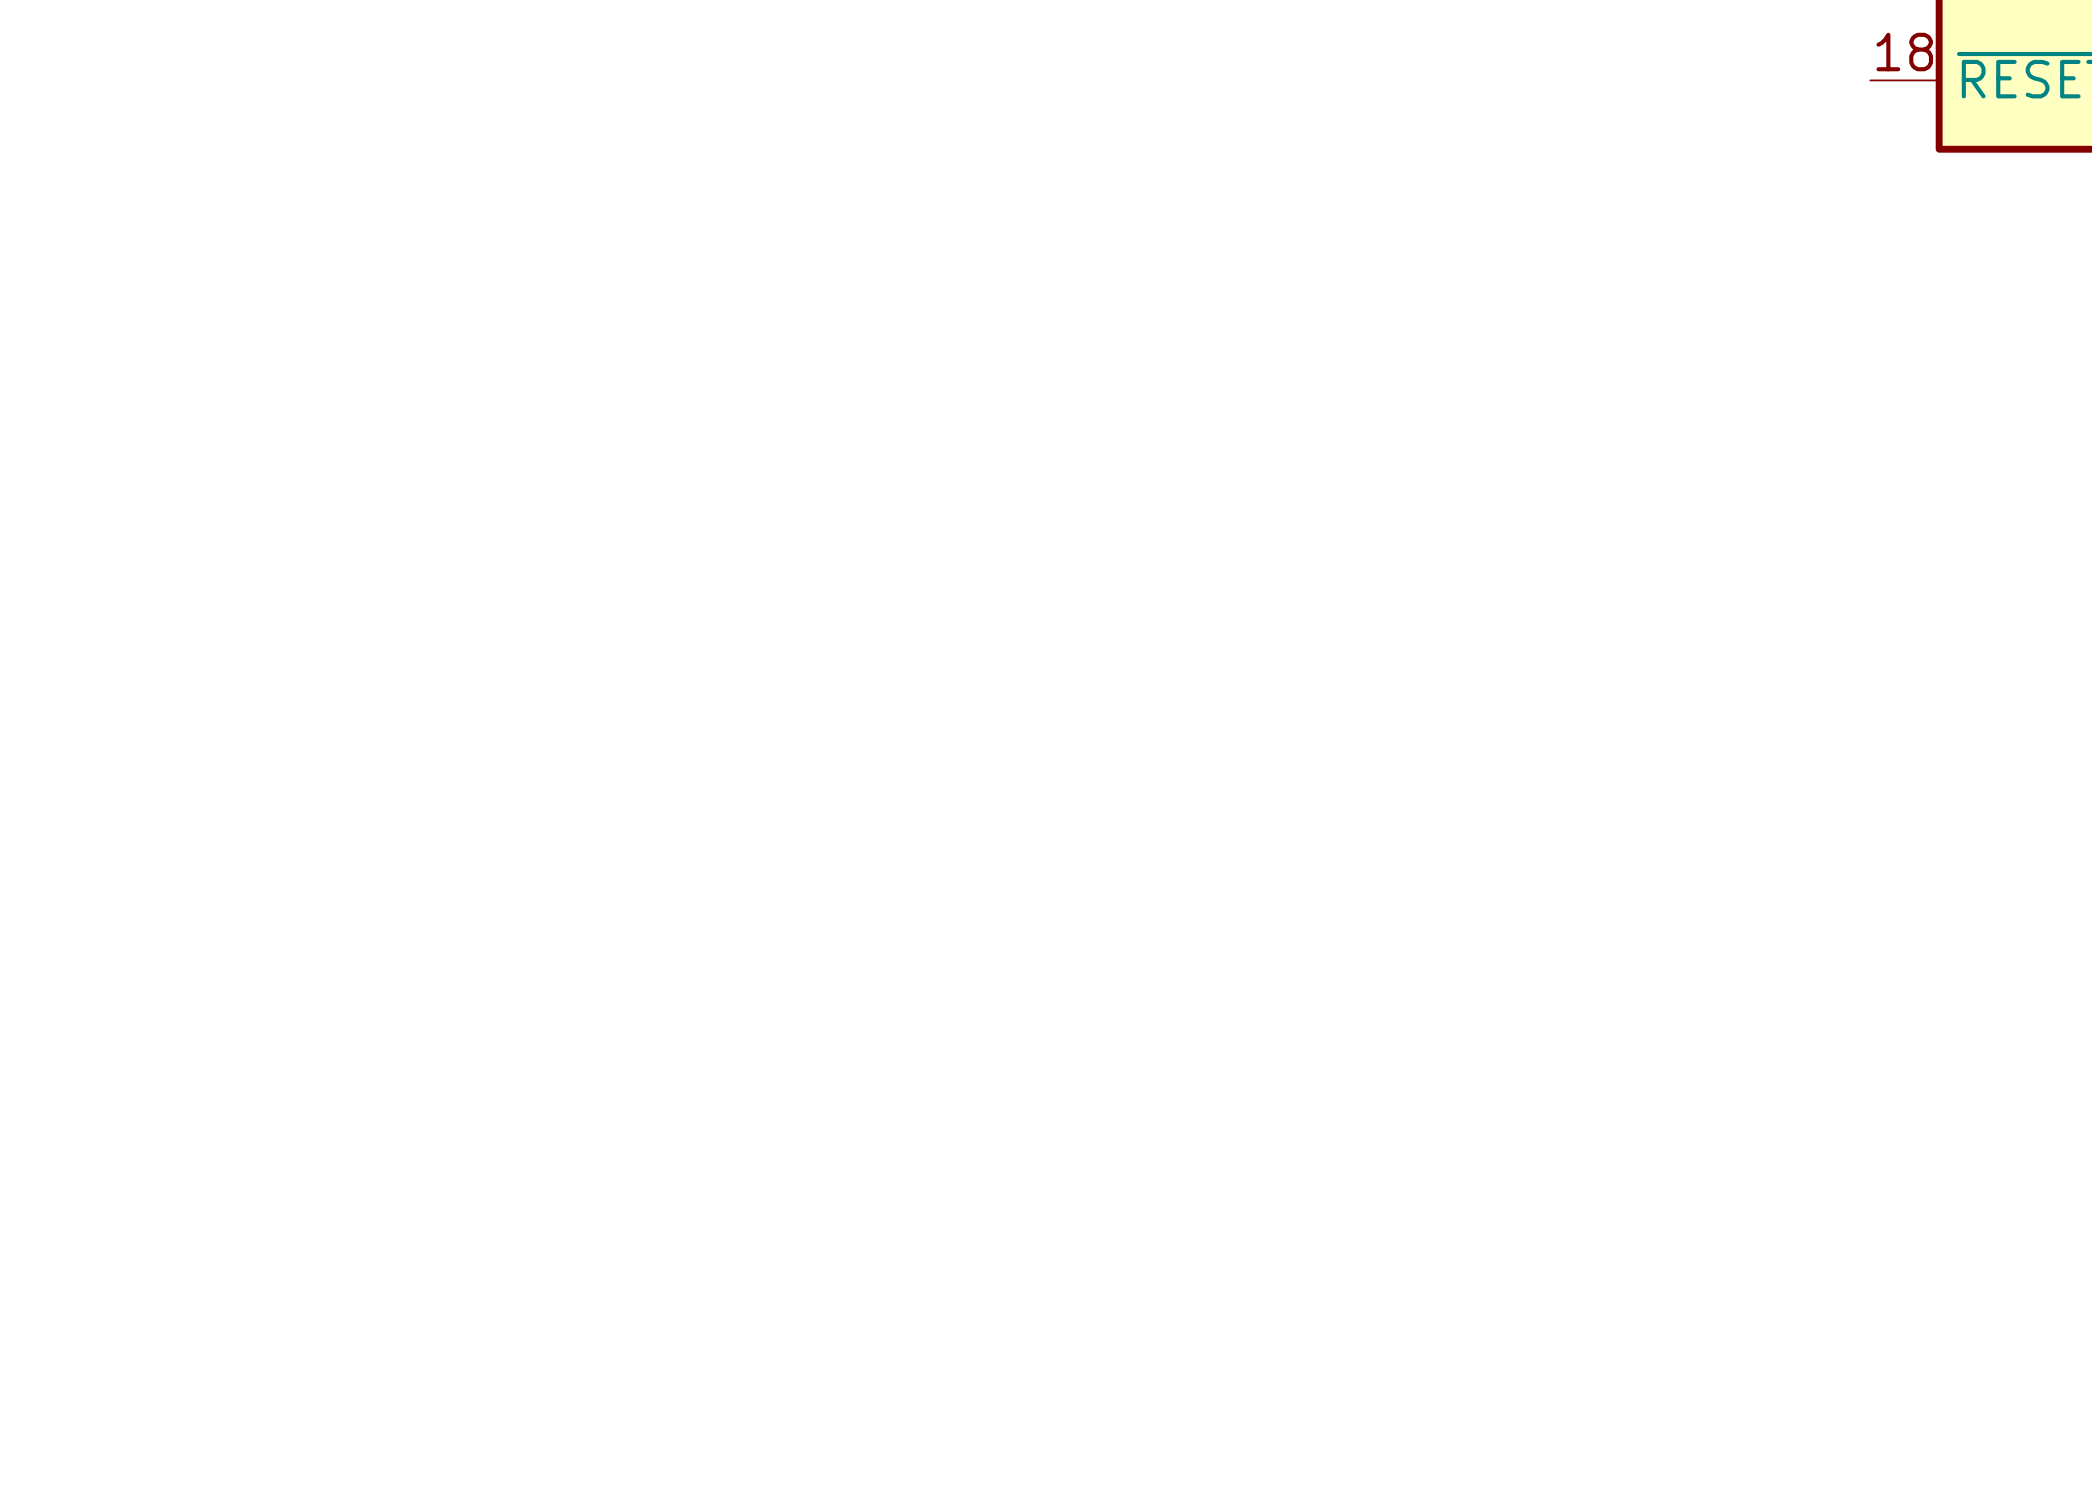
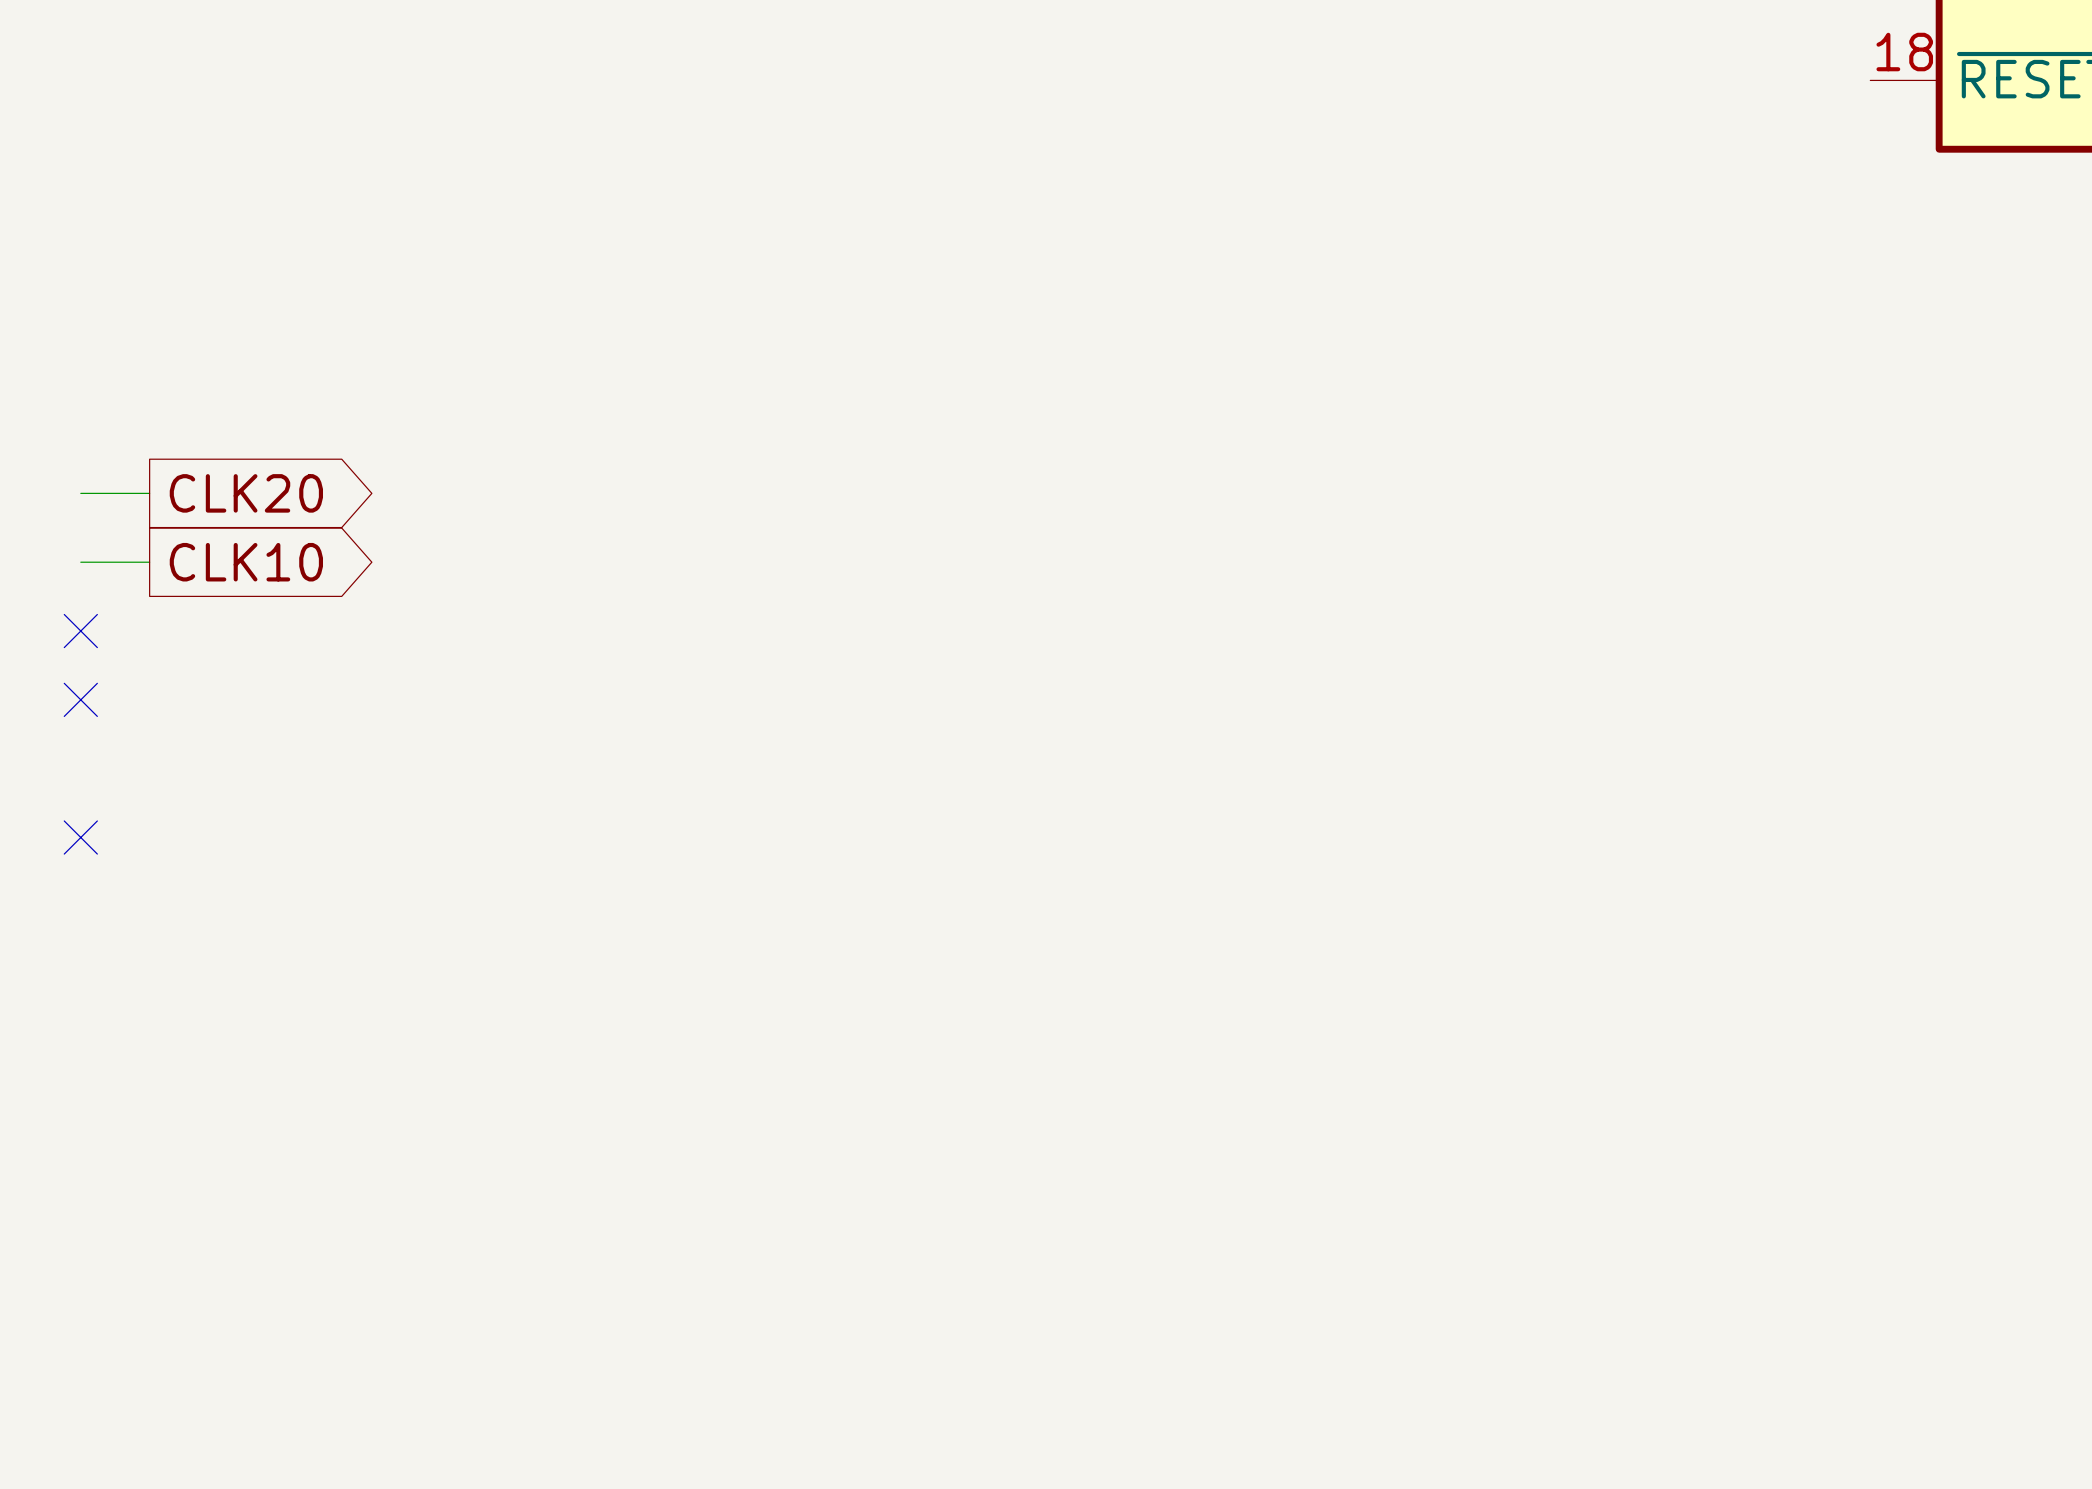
wire: none -> (80, 493) (149, 493)
global label: none -> CLK20 (246, 493)
wire: none -> (80, 562) (149, 562)
global label: none -> CLK10 (246, 562)
no-connect mark: none -> (80, 631)
no-connect mark: none -> (80, 699)
no-connect mark: none -> (80, 837)

